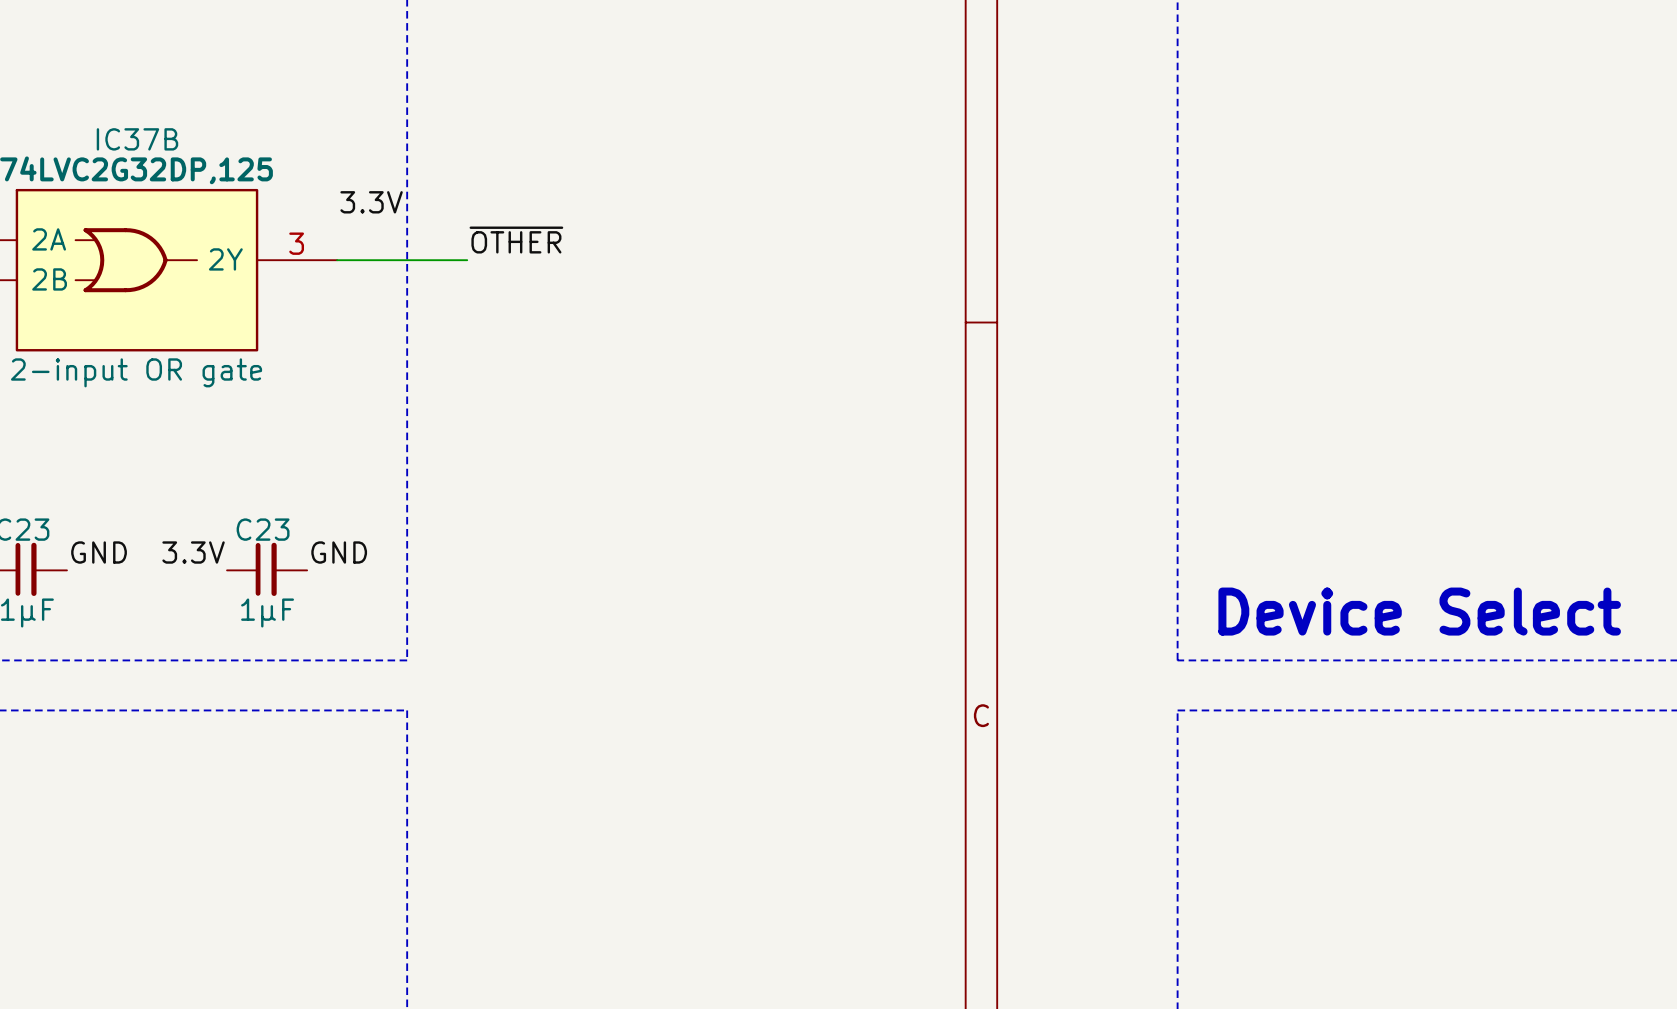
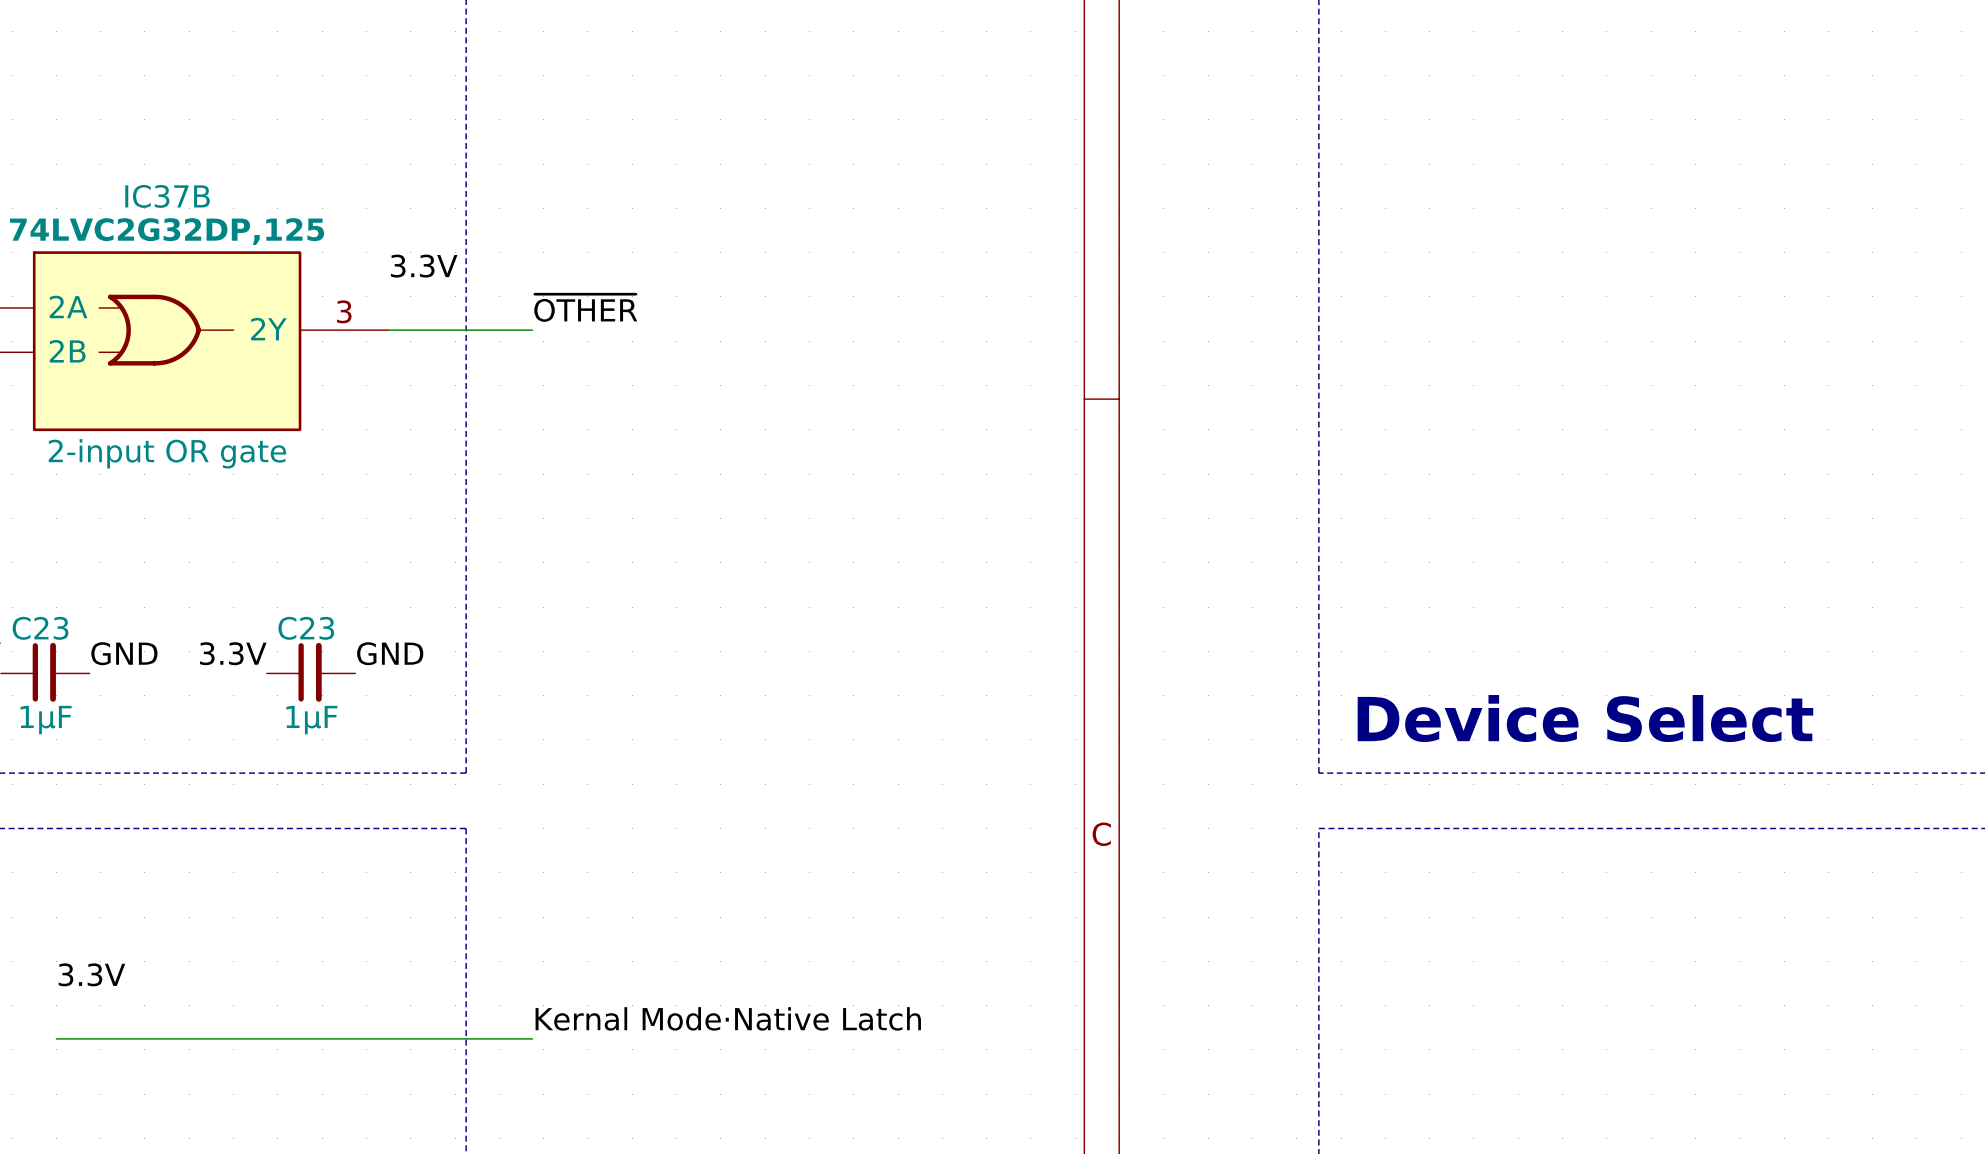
label: none -> 3.3V (91, 974)
label: none -> Kernal Mode·Native Latch (728, 1018)
wire: none -> (56, 1038) (532, 1038)

